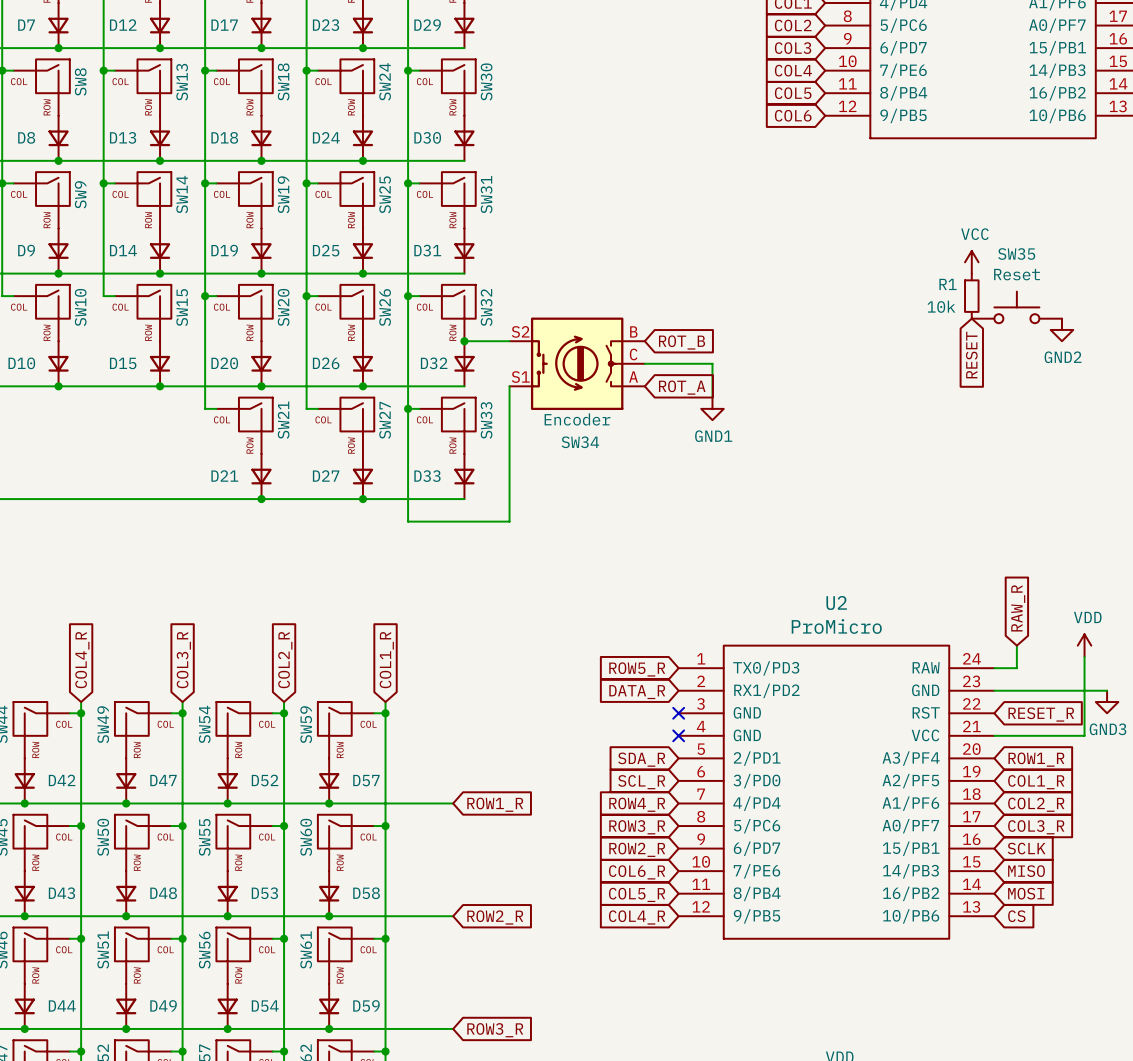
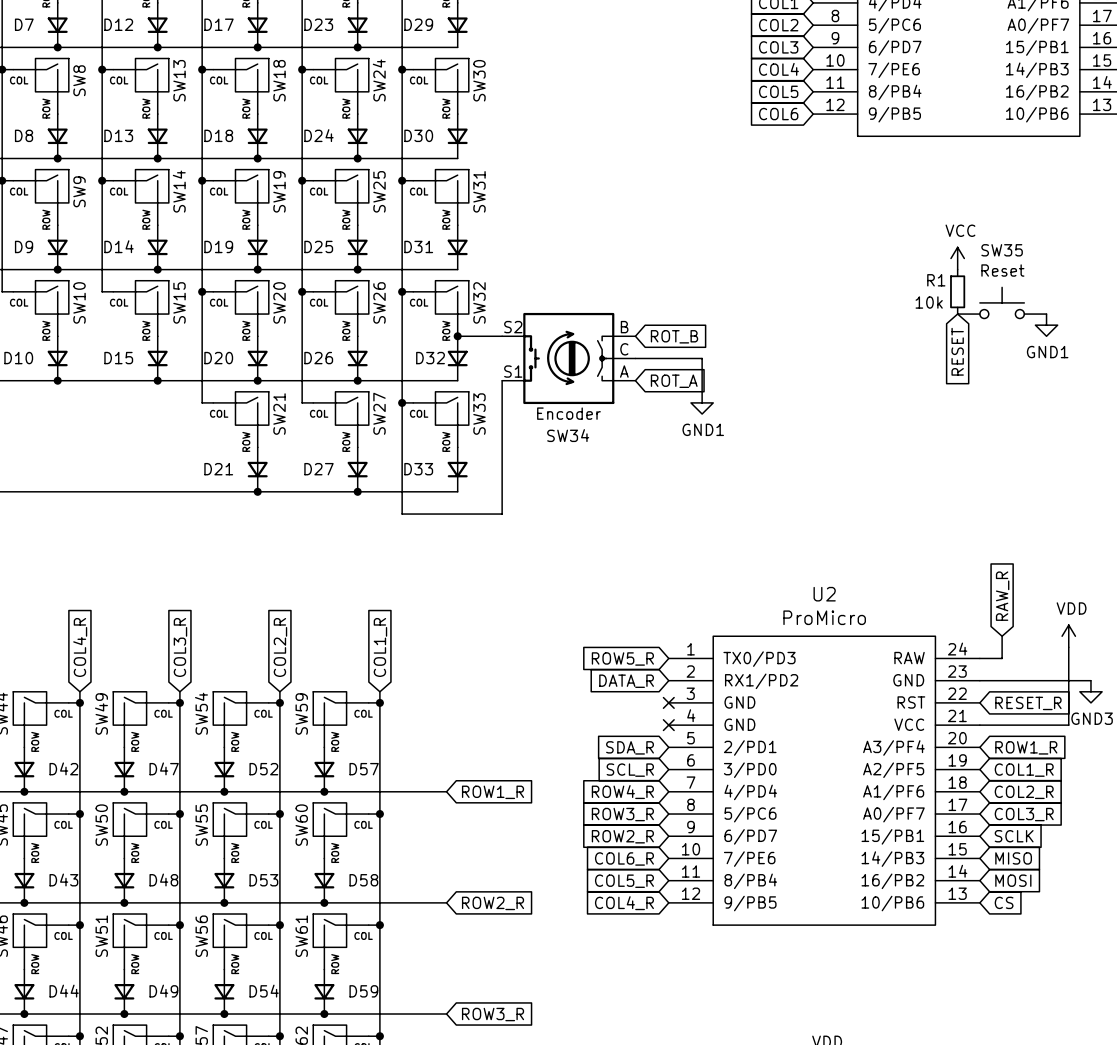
power symbol: GND2 (1061, 329) -> GND1 (1046, 325)

